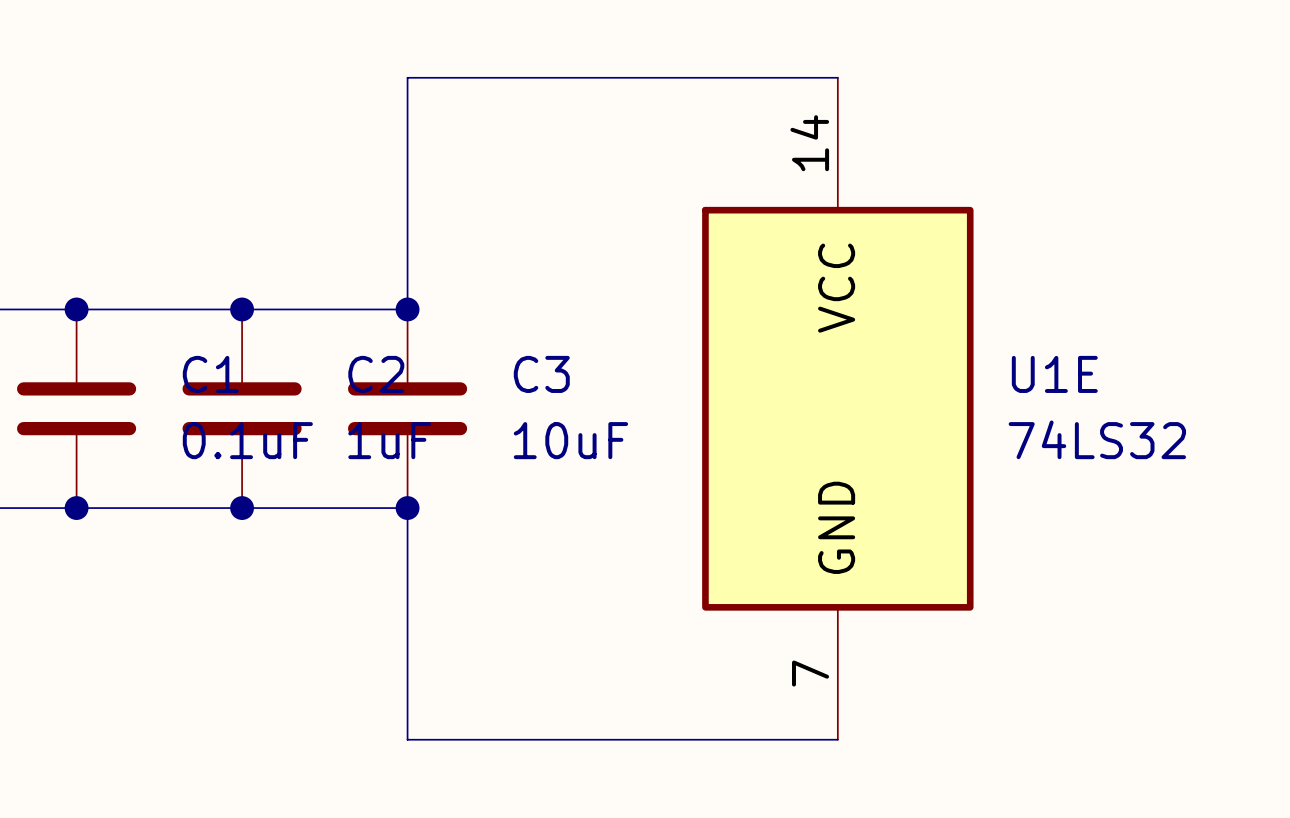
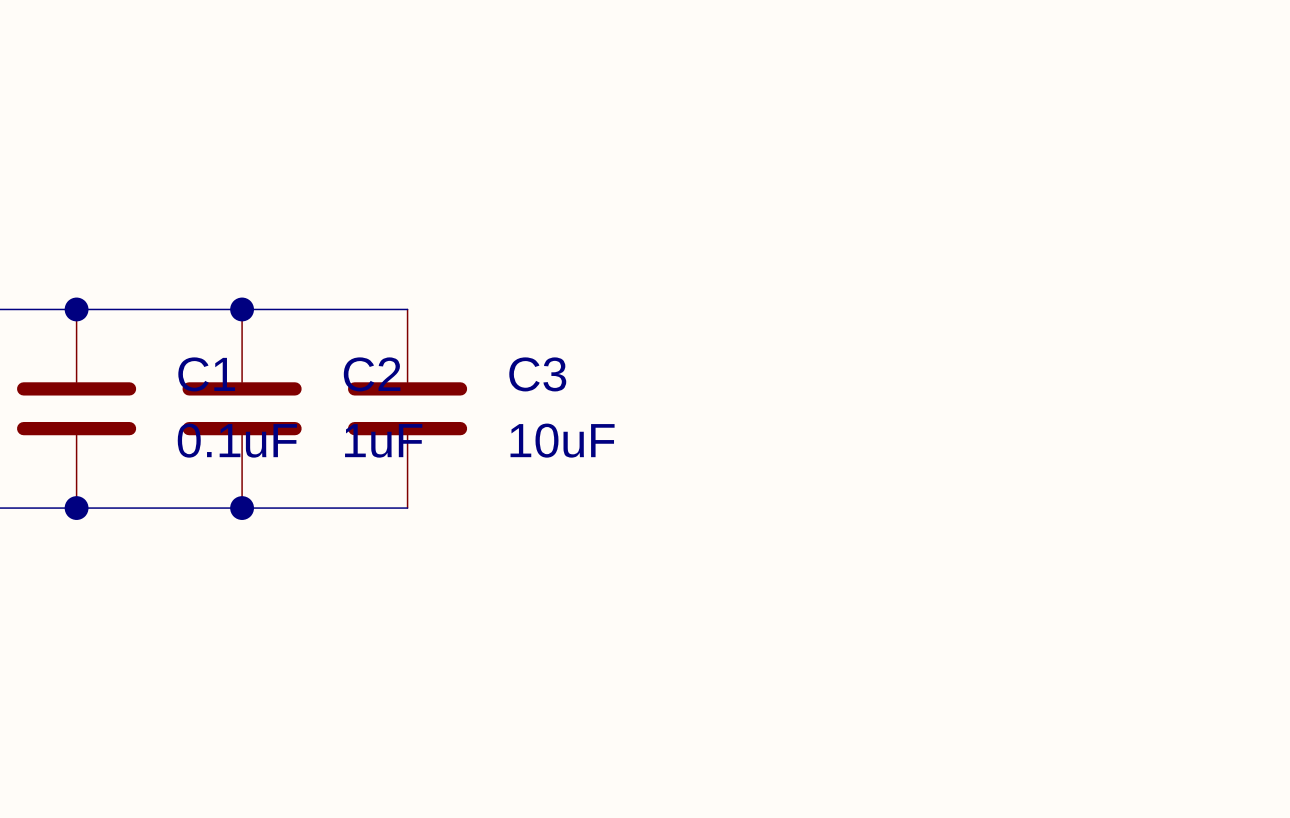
wire: (837, 77) (407, 77) (407, 309) -> none
junction: (407, 309) -> none
U1E: 74LS32 (837, 408) -> none
wire: (407, 508) (407, 739) (837, 739) -> none
junction: (407, 508) -> none

